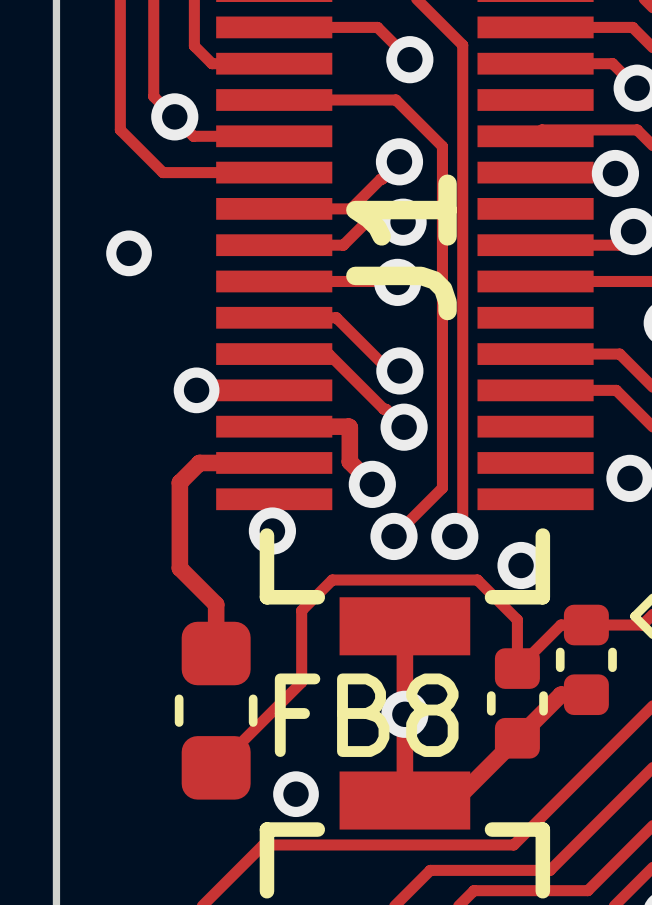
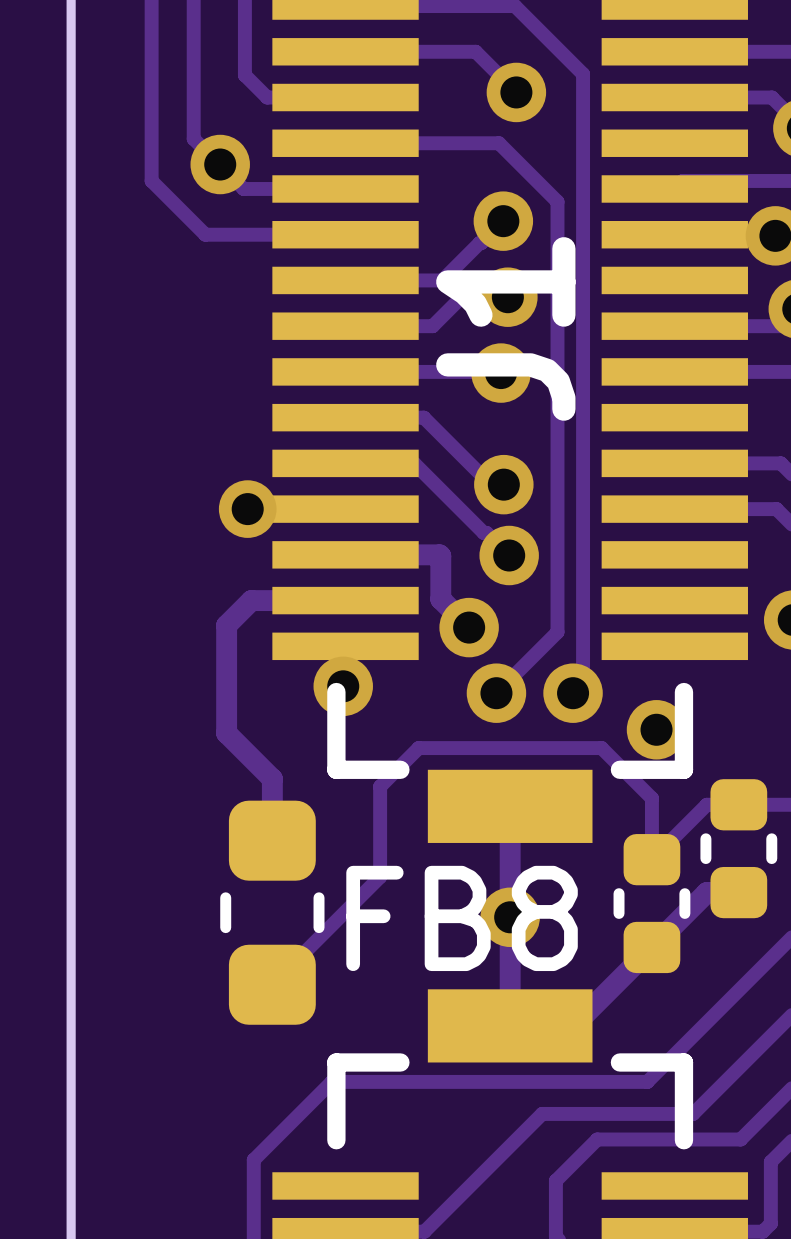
via: (129, 253) -> none
via: (296, 794) -> none

